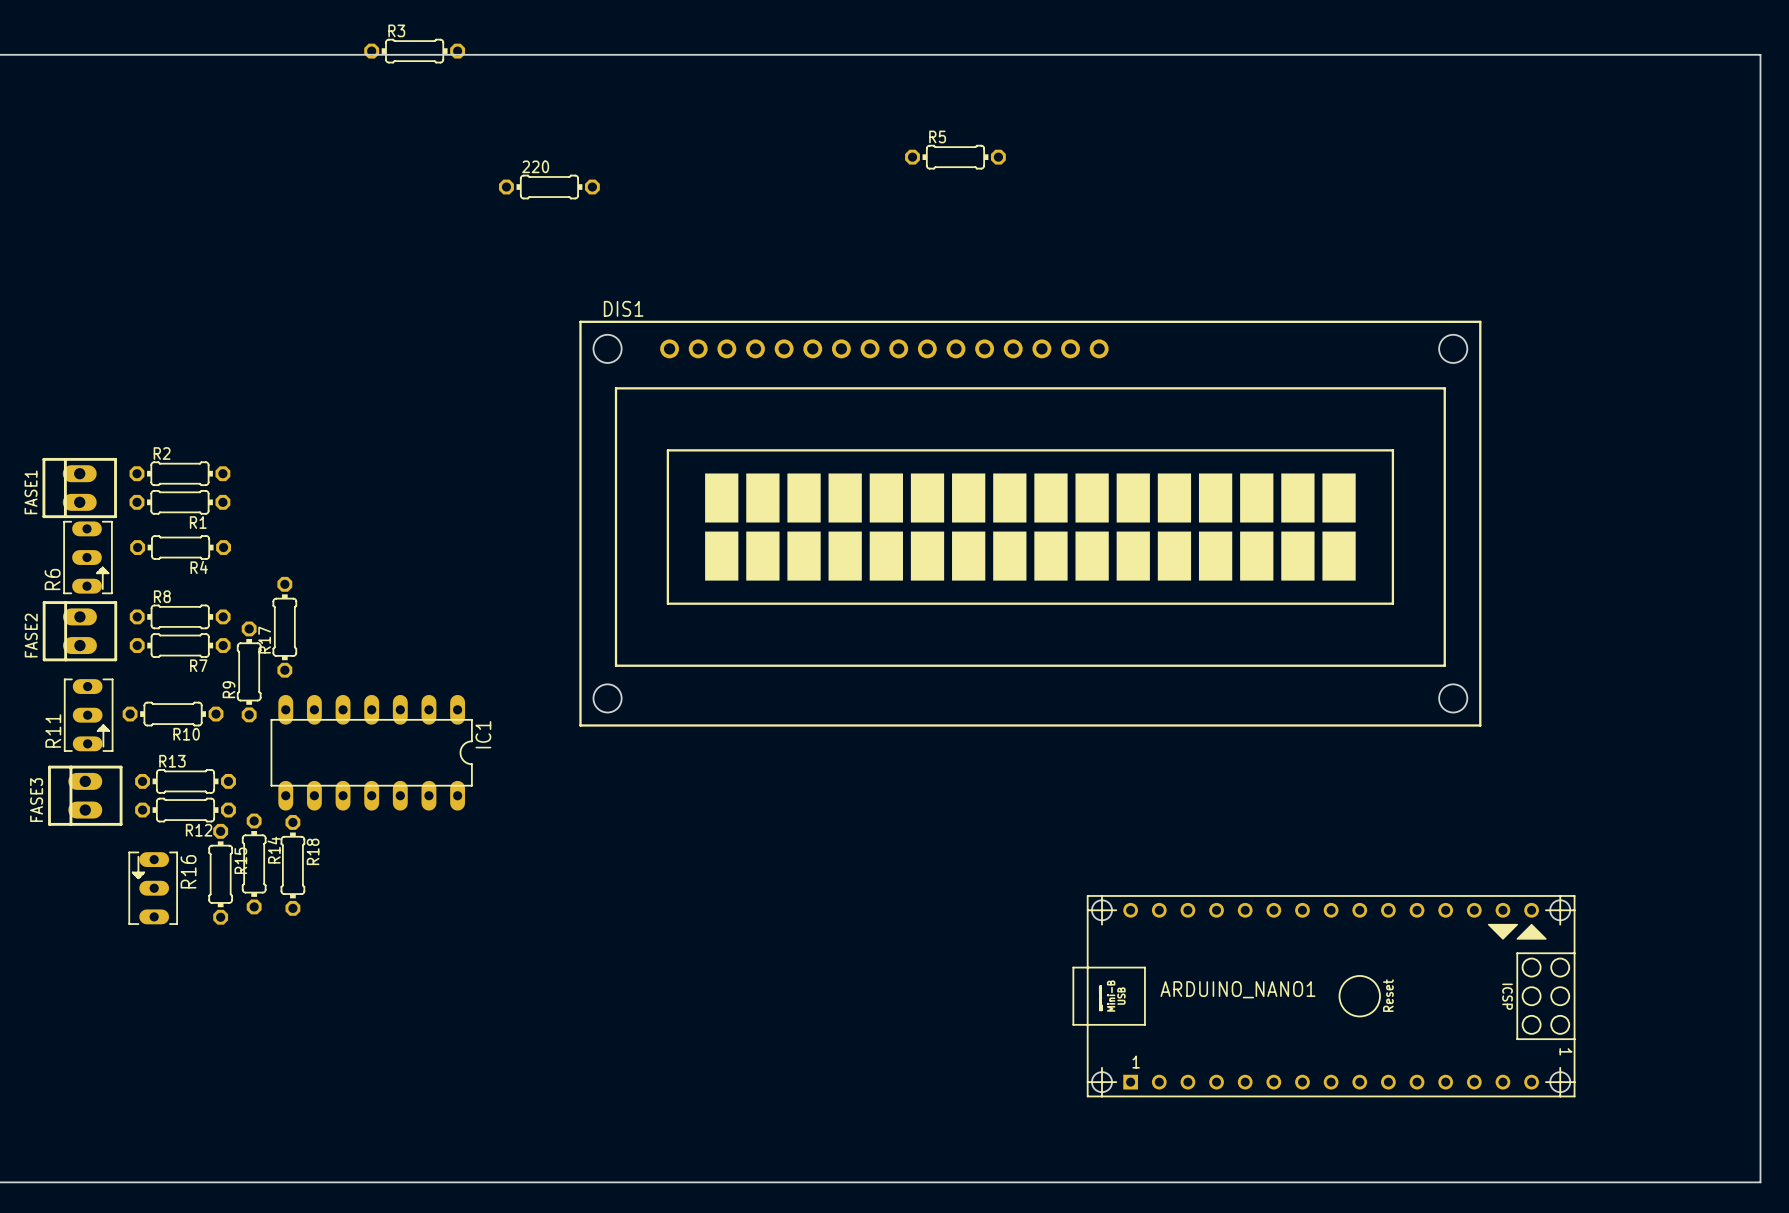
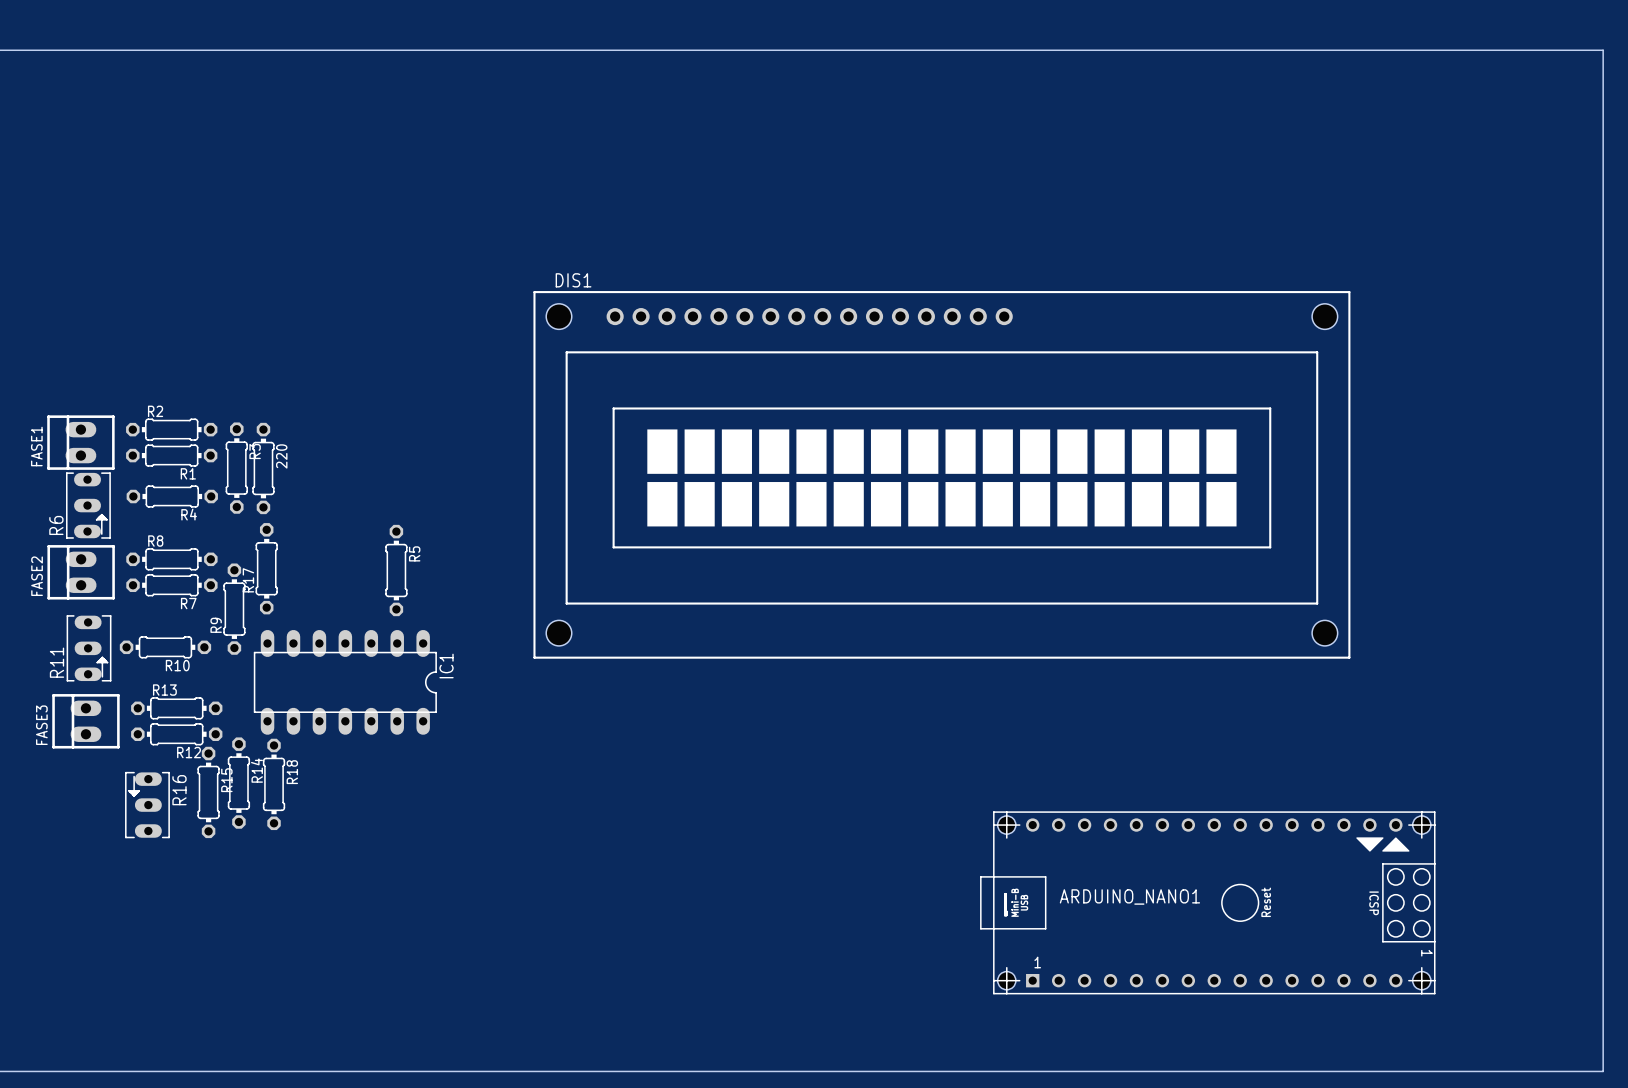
R3 rotation: 0° (414, 51) -> 90° clockwise (236, 468)
R3 position: (414, 51) -> (236, 468)
R5 rotation: 0° (955, 157) -> 90° clockwise (396, 570)
R5 position: (955, 157) -> (396, 570)
220 rotation: 0° (549, 187) -> 90° clockwise (263, 468)
220 position: (549, 187) -> (263, 468)

